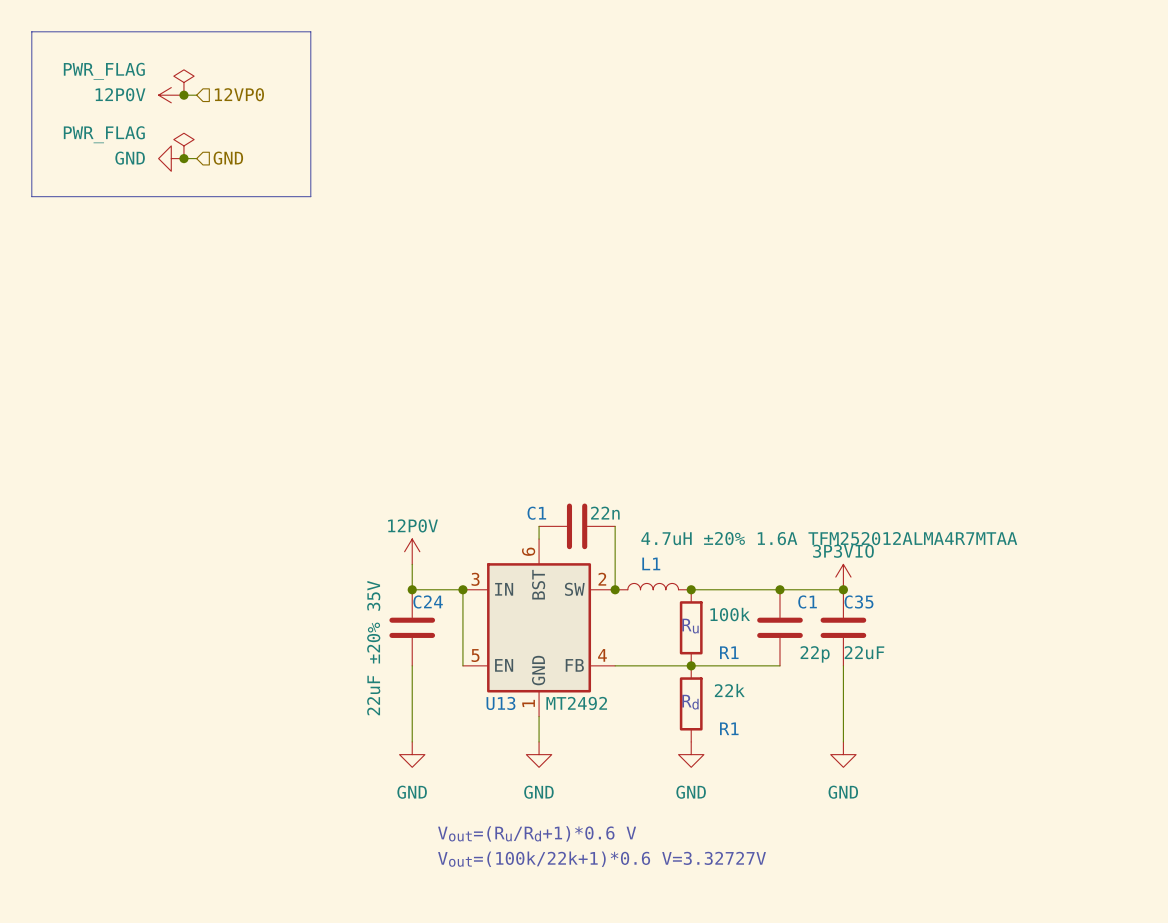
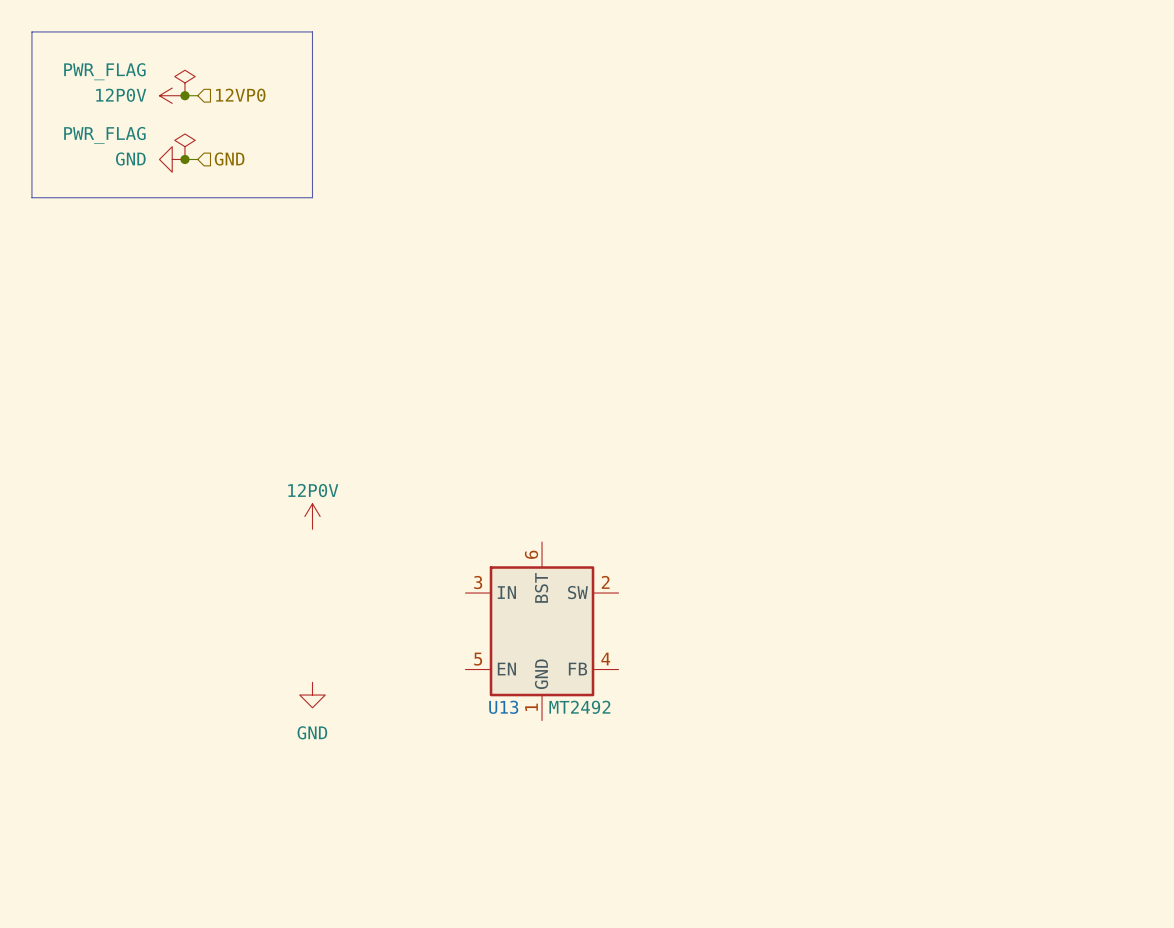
wire: (539, 526) (539, 539) -> none
C1: 22n (577, 526) -> none
wire: (615, 526) (615, 589) -> none
power symbol position: 12P0V (412, 551) -> 12P0V (312, 516)
wire: (412, 564) (412, 589) (462, 589) (462, 665) -> none
power symbol: 3P3VIO (843, 577) -> none
L1: 4.7uH ±20% 1.6A TFM252012ALMA4R7MTAA (653, 586) -> none
junction: (412, 589) -> none
junction: (462, 589) -> none
junction: (615, 589) -> none
wire: (691, 589) (843, 589) -> none
junction: (691, 589) -> none
junction: (779, 589) -> none
junction: (843, 589) -> none
text: Ru (690, 626) -> none
C24: 22uF ±20% 35V (412, 627) -> none
R1: 100k (691, 627) -> none
C1: 22p (779, 627) -> none
C35: 22uF (843, 627) -> none
wire: (412, 665) (412, 741) -> none
wire: (615, 665) (779, 665) -> none
junction: (691, 665) -> none
wire: (843, 665) (843, 741) -> none
power symbol: none -> GND (312, 695)
text: Rd (690, 702) -> none
R1: 22k (691, 703) -> none
wire: (539, 716) (539, 741) -> none
power symbol: GND (412, 754) -> none
power symbol: GND (539, 754) -> none
power symbol: GND (691, 754) -> none
power symbol: GND (843, 754) -> none
text: Vout=(Ru/Rd+1)*0.6 V (537, 833) -> none
text: Vout=(100k/22k+1)*0.6 V=3.32727V (602, 859) -> none

